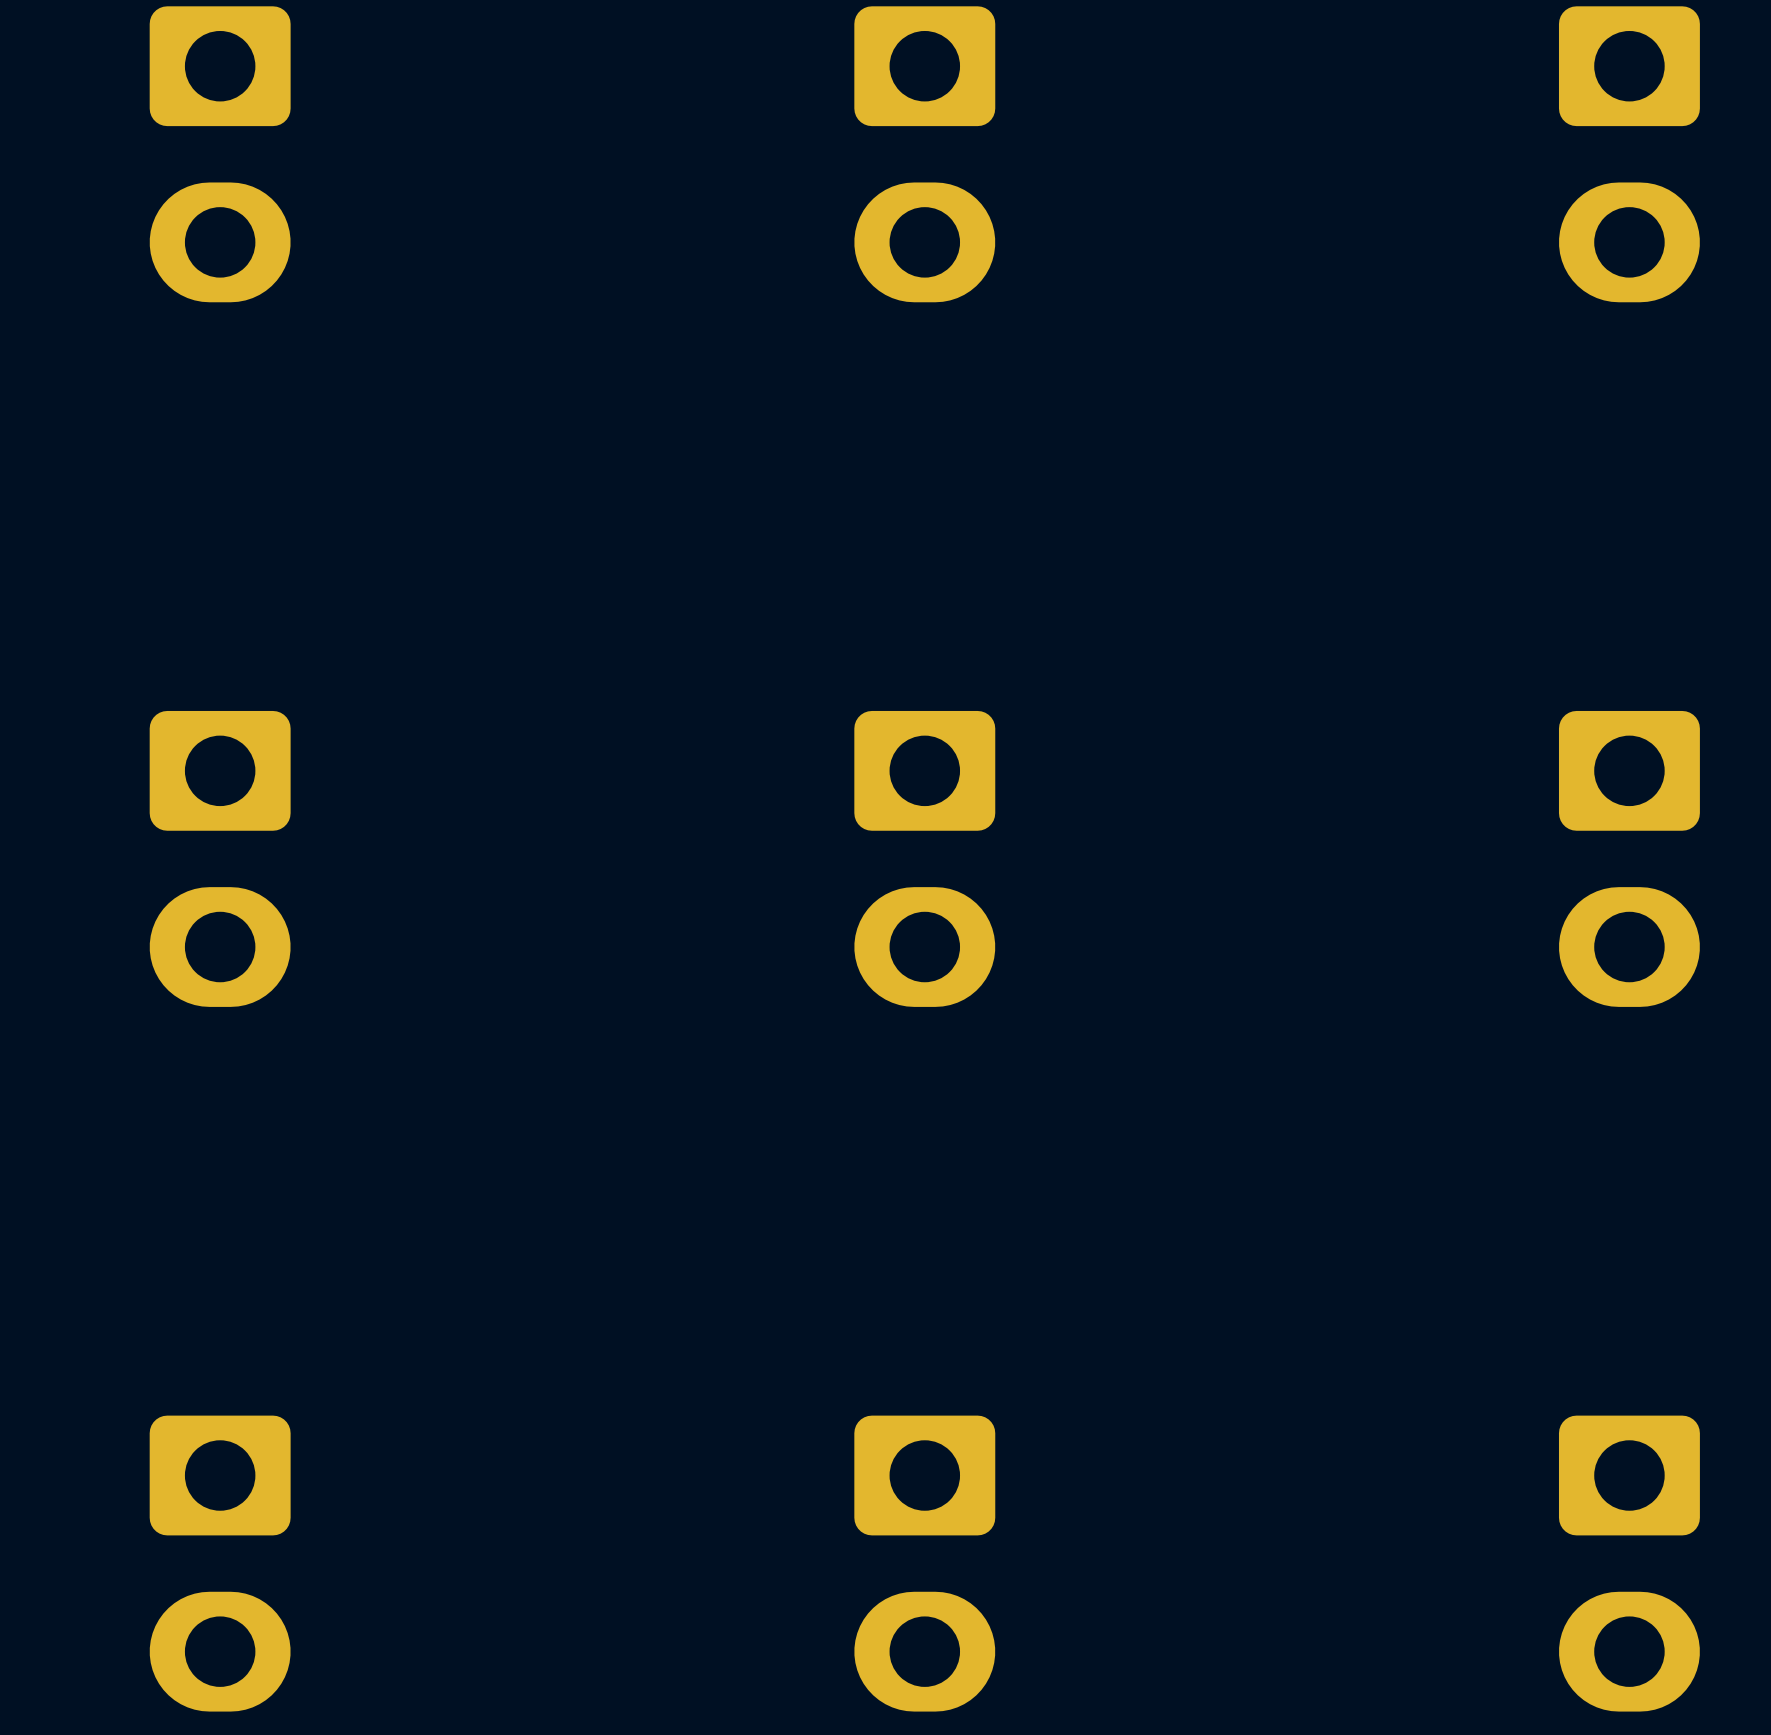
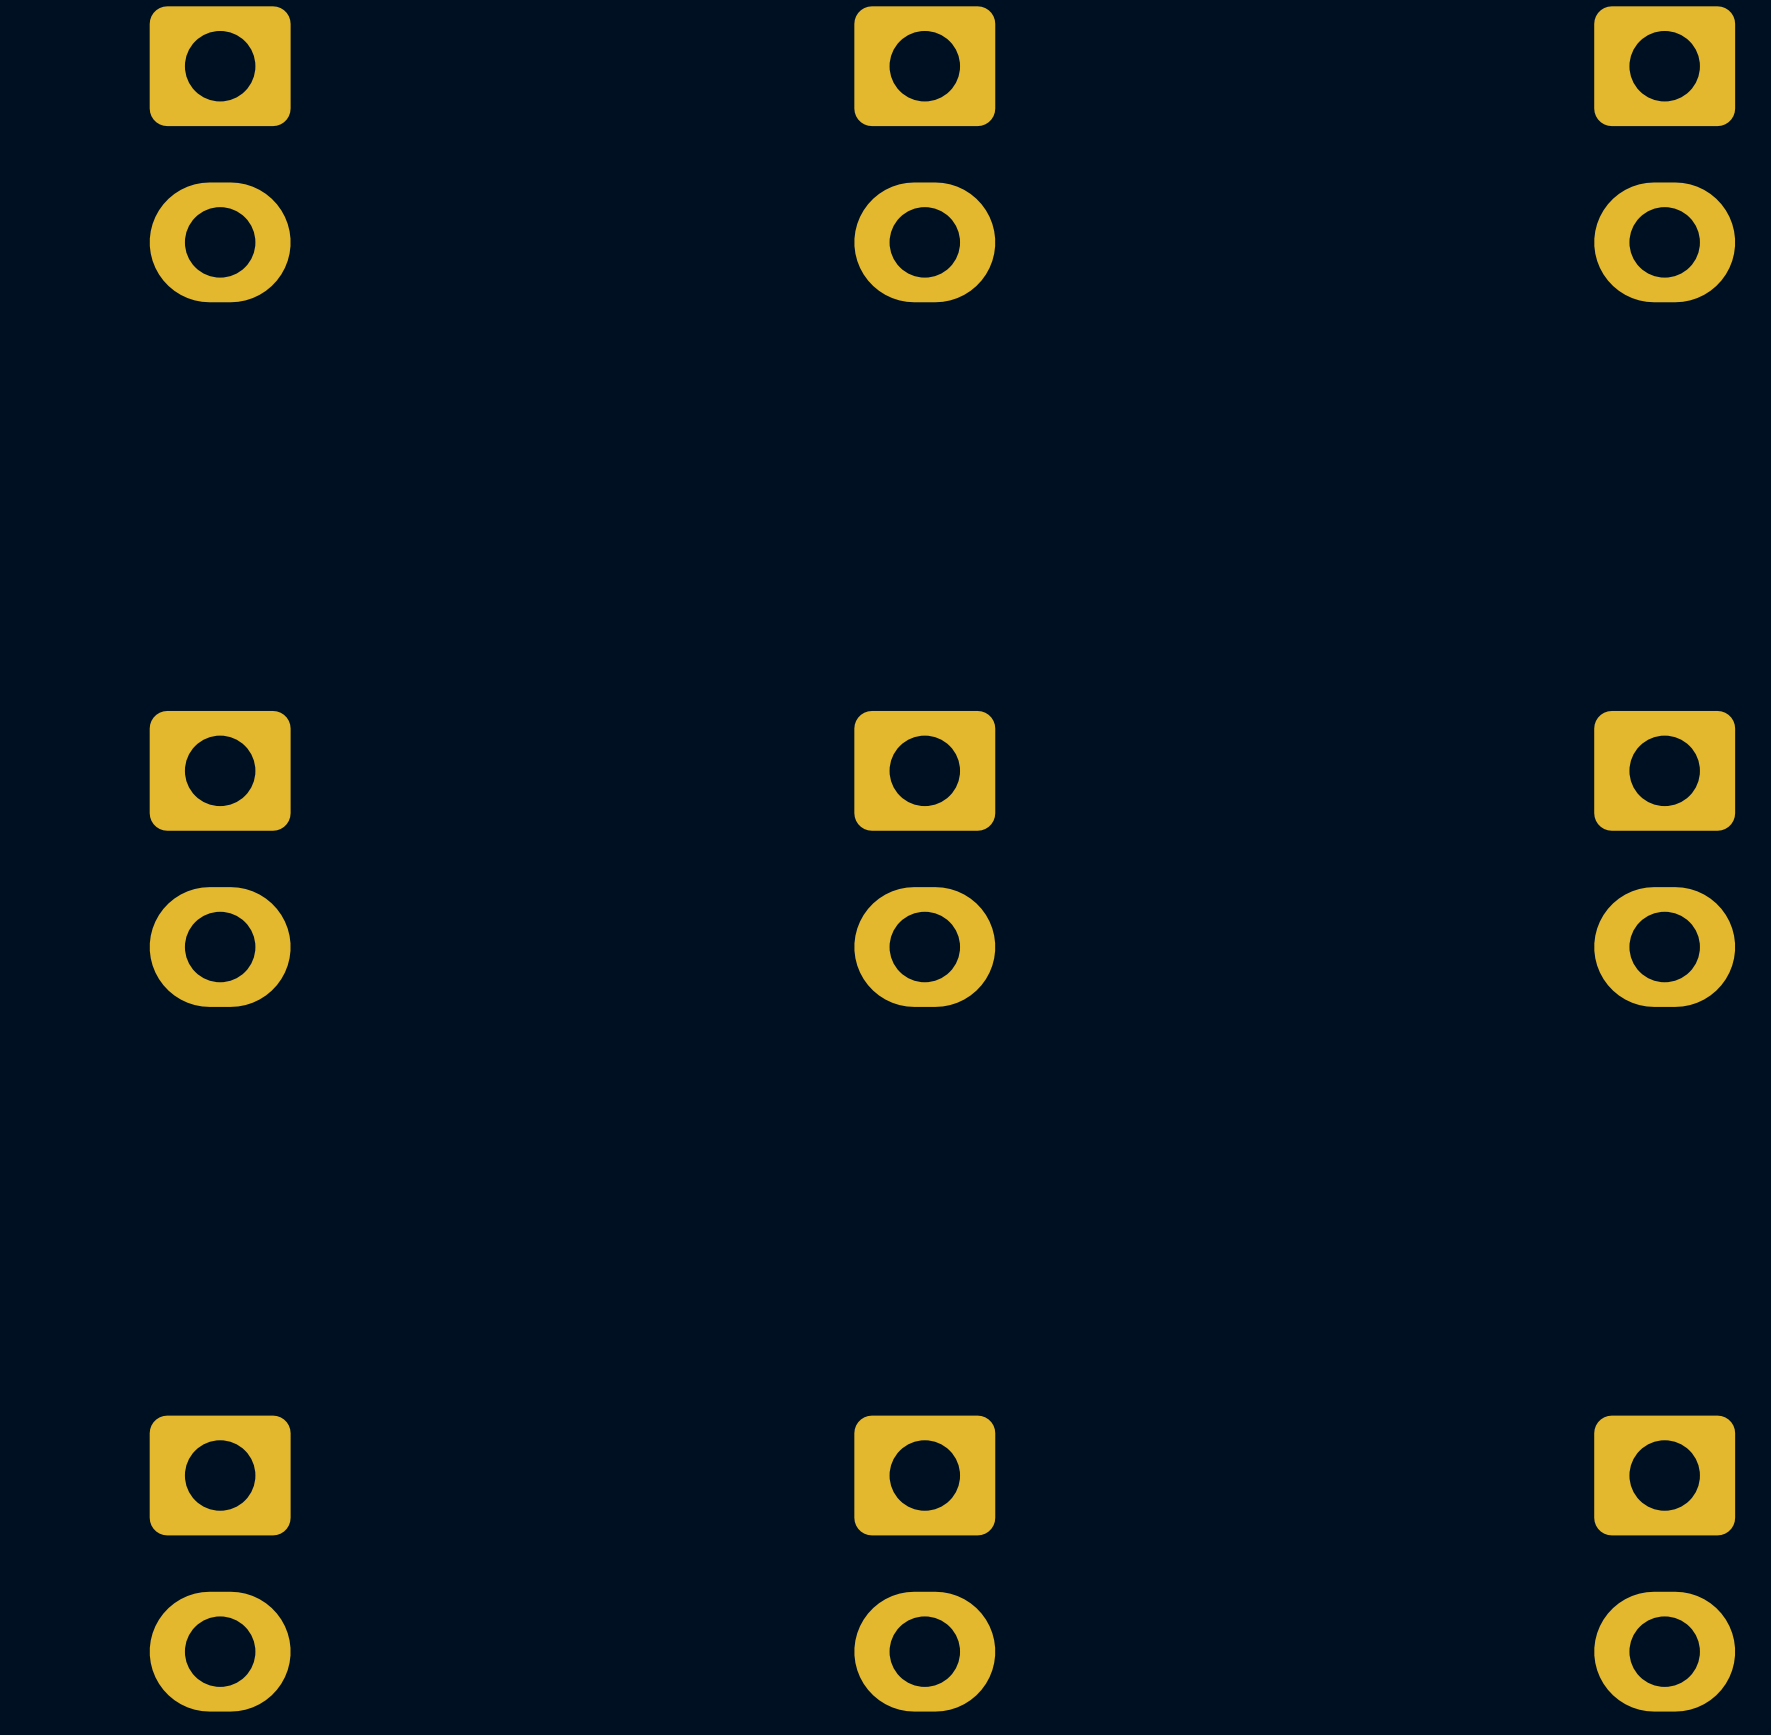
part position: (1629, 154) -> (1664, 154)
part position: (1629, 858) -> (1664, 858)
part position: (1629, 1563) -> (1664, 1563)

